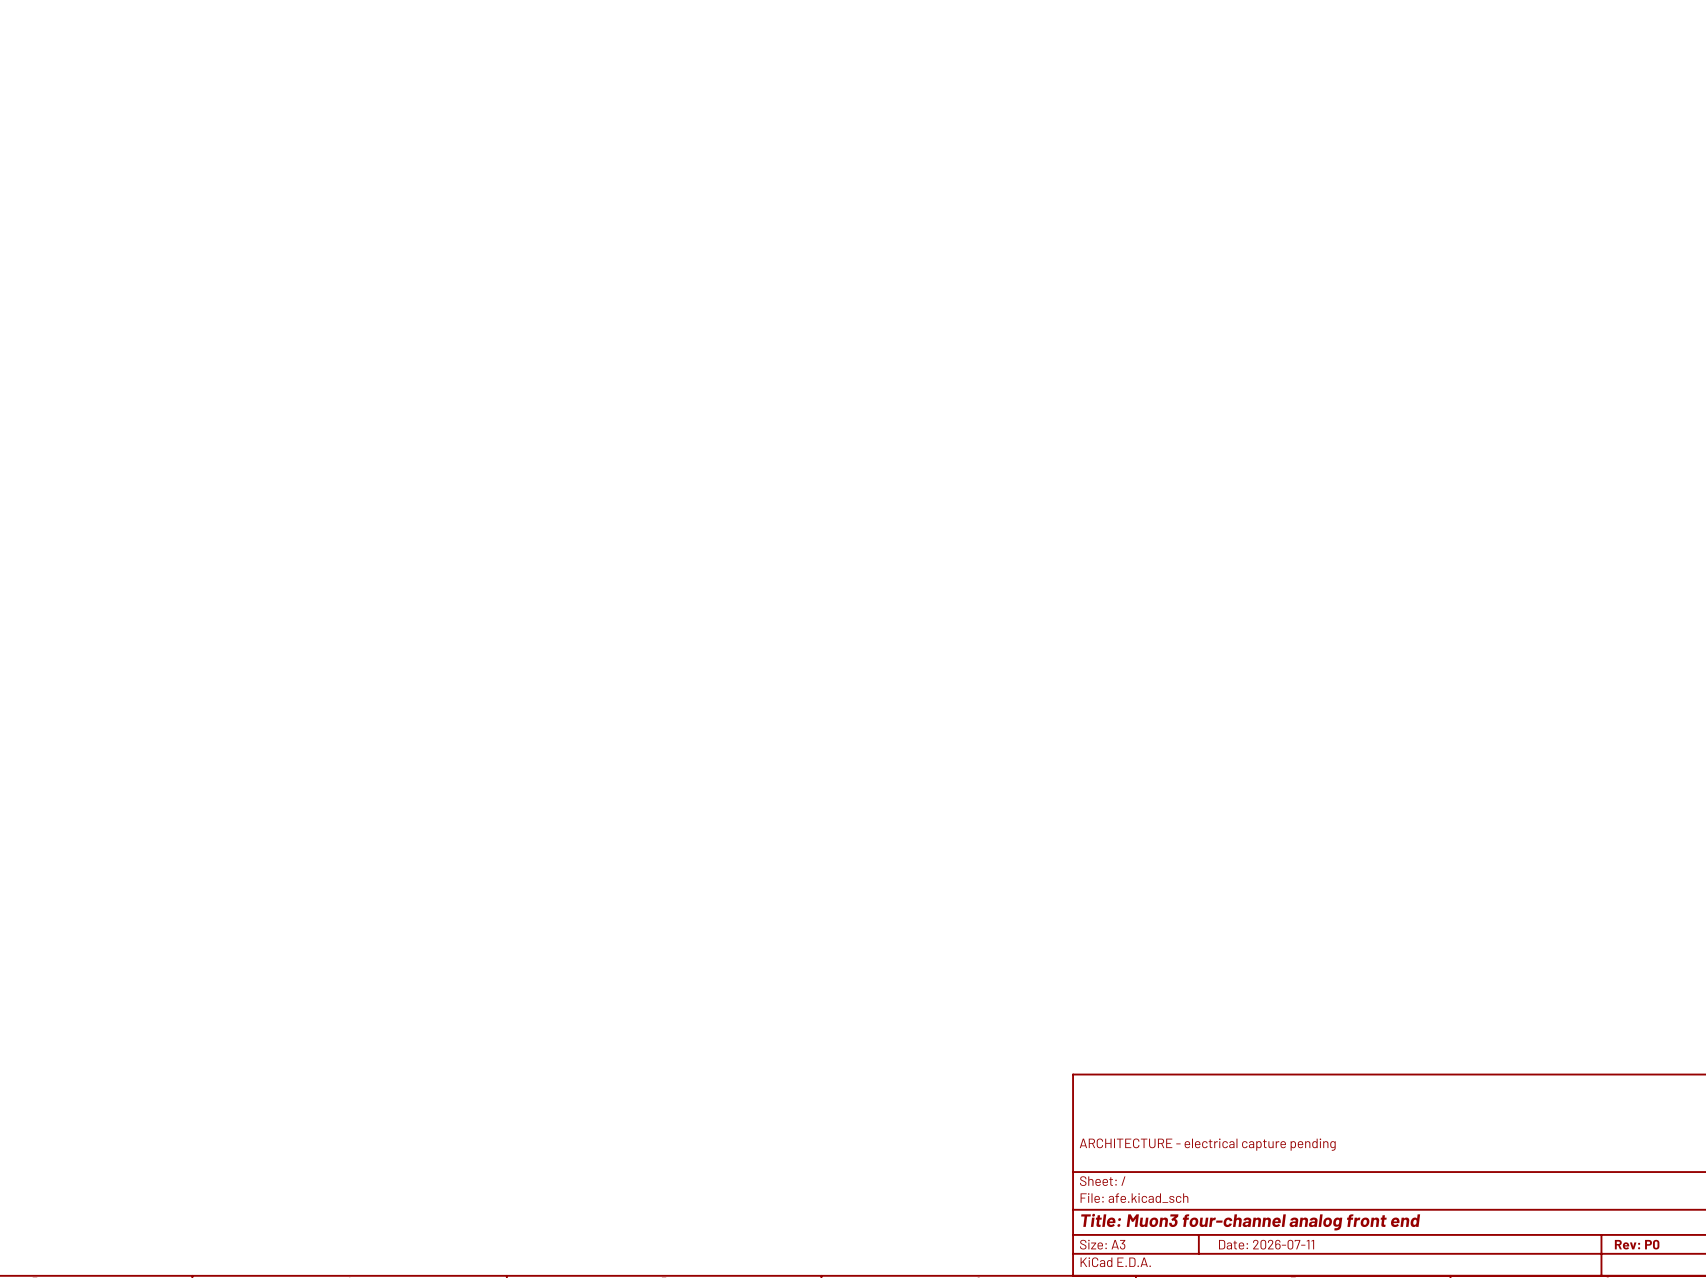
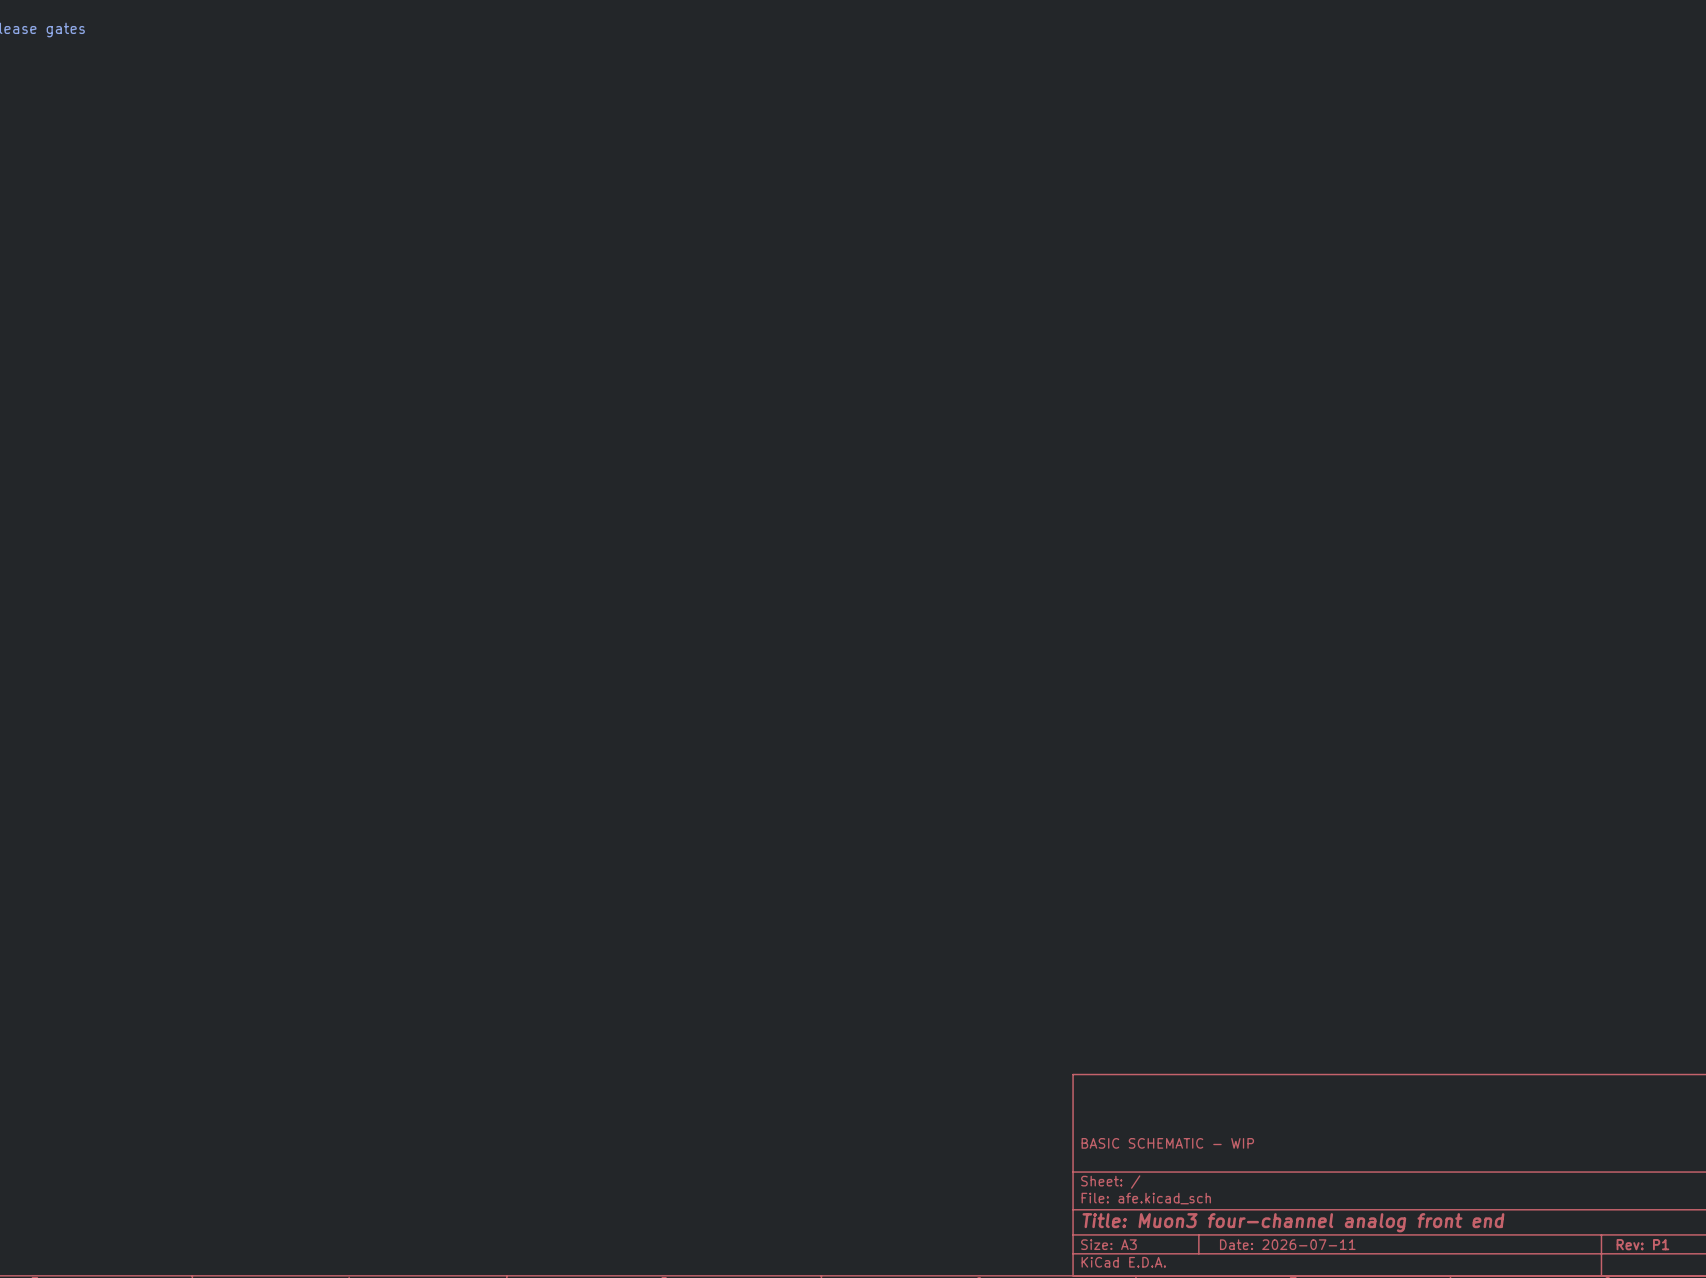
title block: ARCHITECTURE - electrical capture pending (1207, 1144) -> BASIC SCHEMATIC - WIP (1167, 1143)
title block: Rev: P0 (1637, 1244) -> Rev: P1 (1642, 1244)

